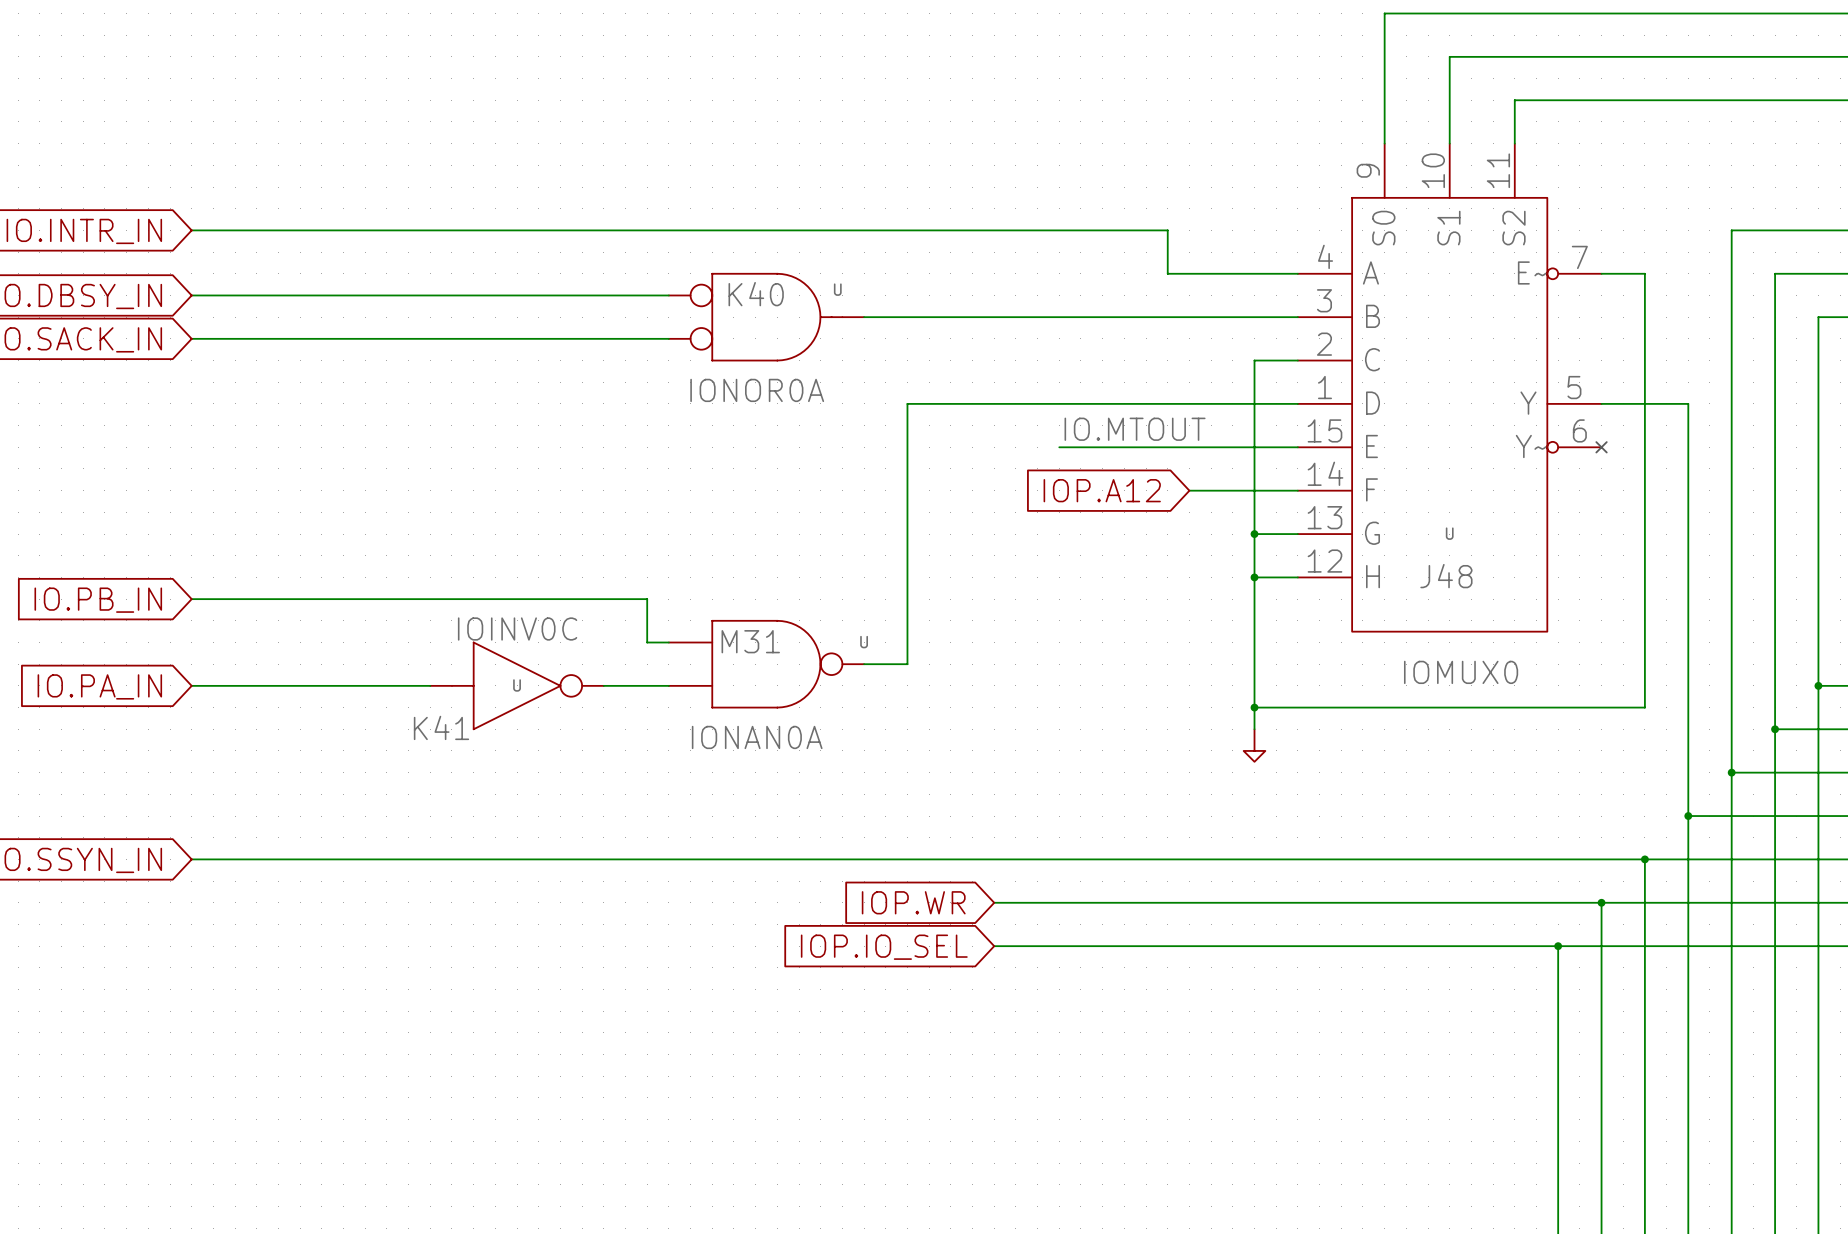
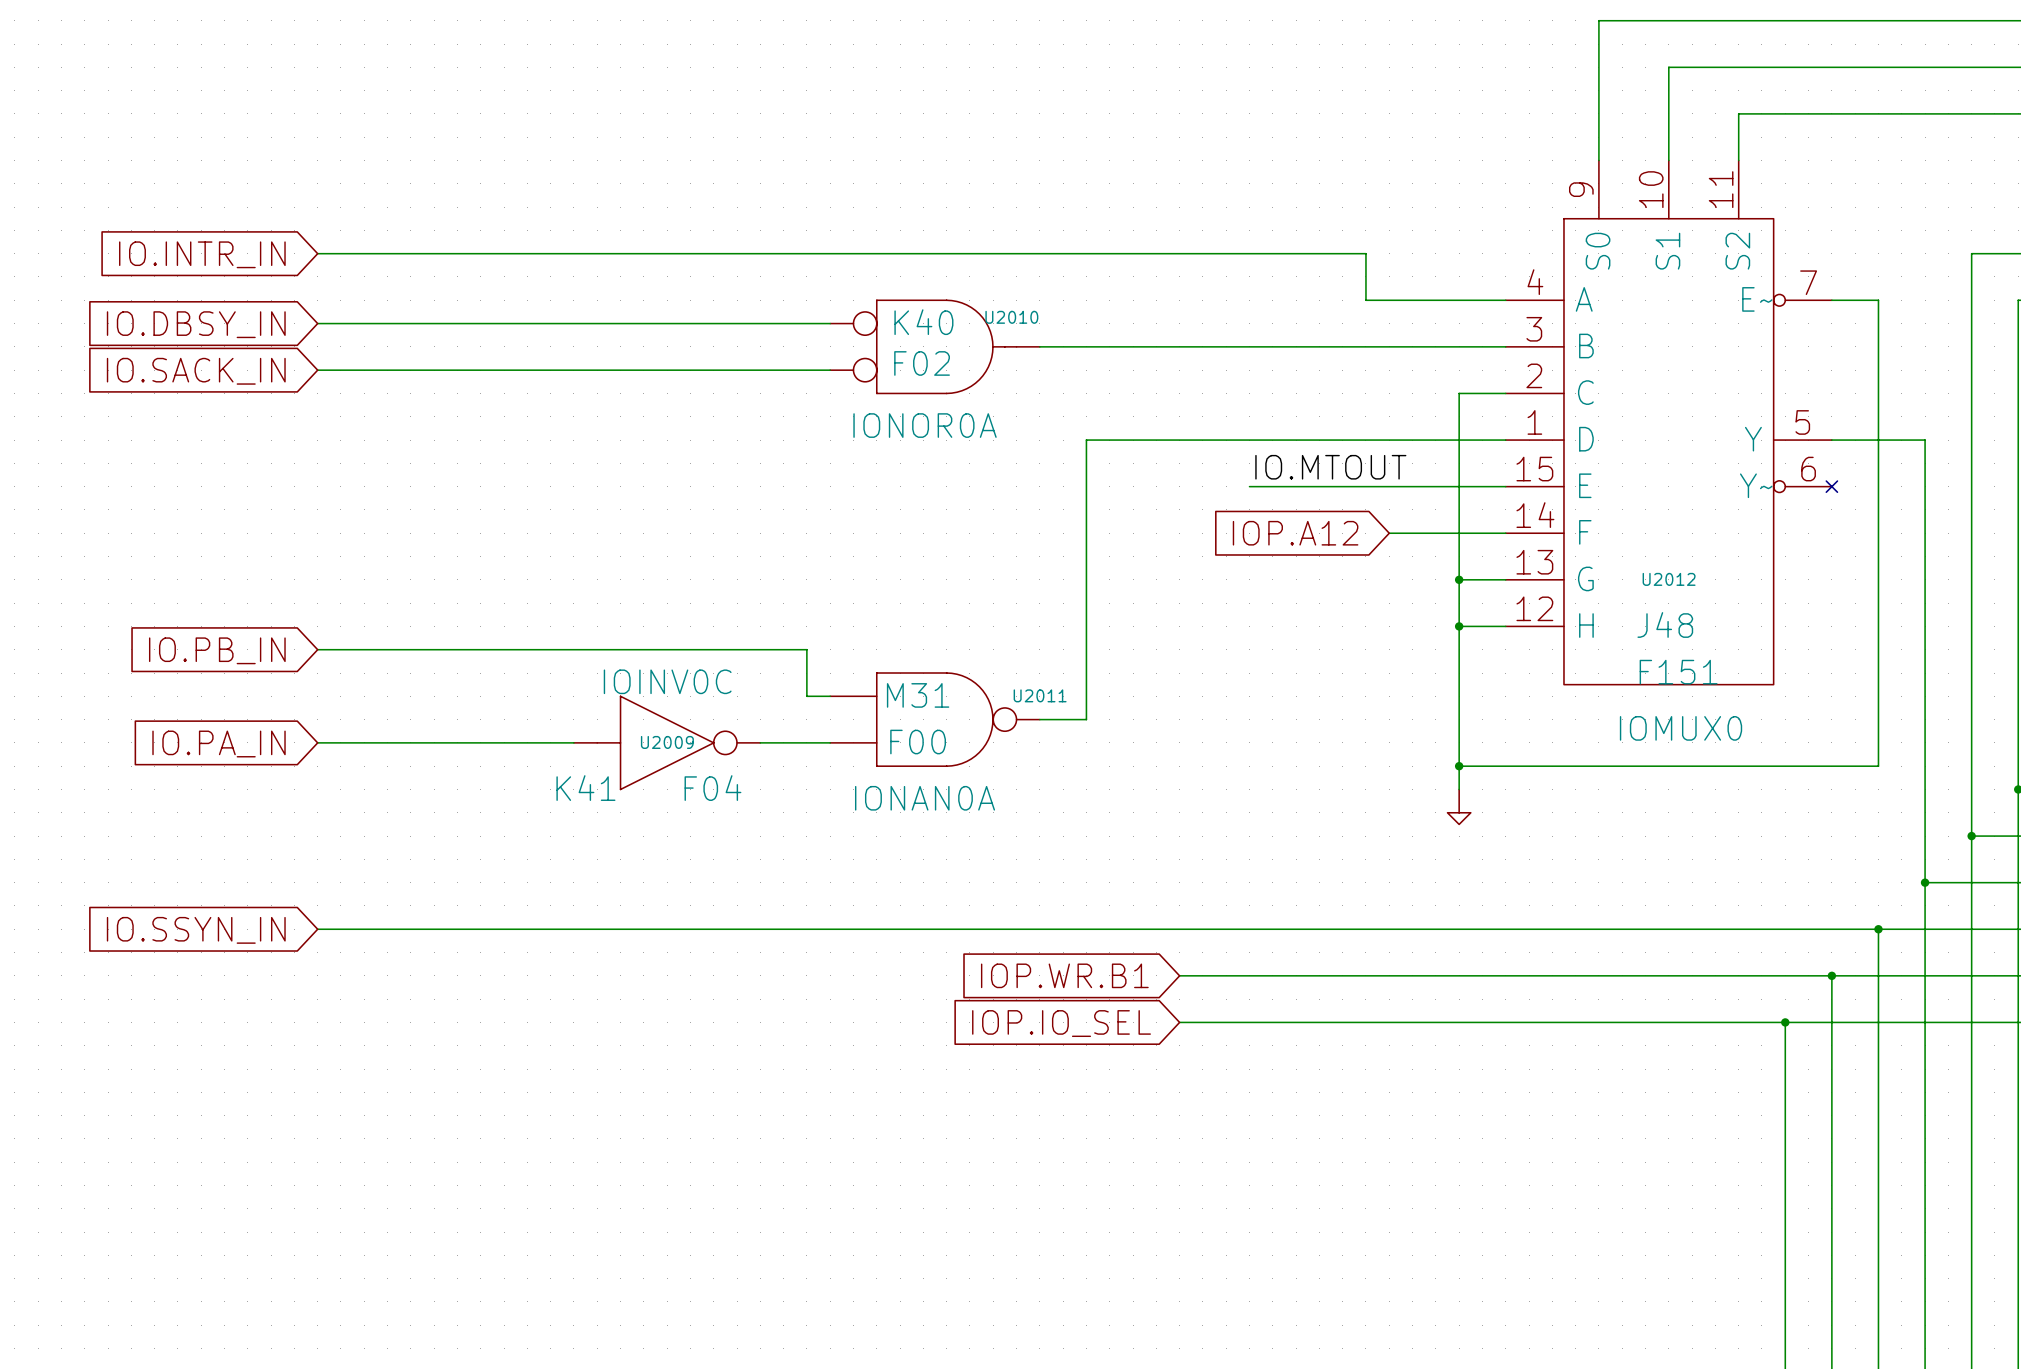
U name: U (837, 289) -> U2010 (1011, 317)
U value: none -> F02 (922, 363)
U name: U (1449, 533) -> U2012 (1669, 579)
U value: none -> F151 (1678, 672)
U name: U (864, 642) -> U2011 (1040, 695)
U name: U (517, 685) -> U2009 (667, 742)
U value: none -> F00 (918, 742)
U value: none -> F04 (712, 788)
global label: IOP.WR (913, 902) -> IOP.WR.B1 (1064, 975)

